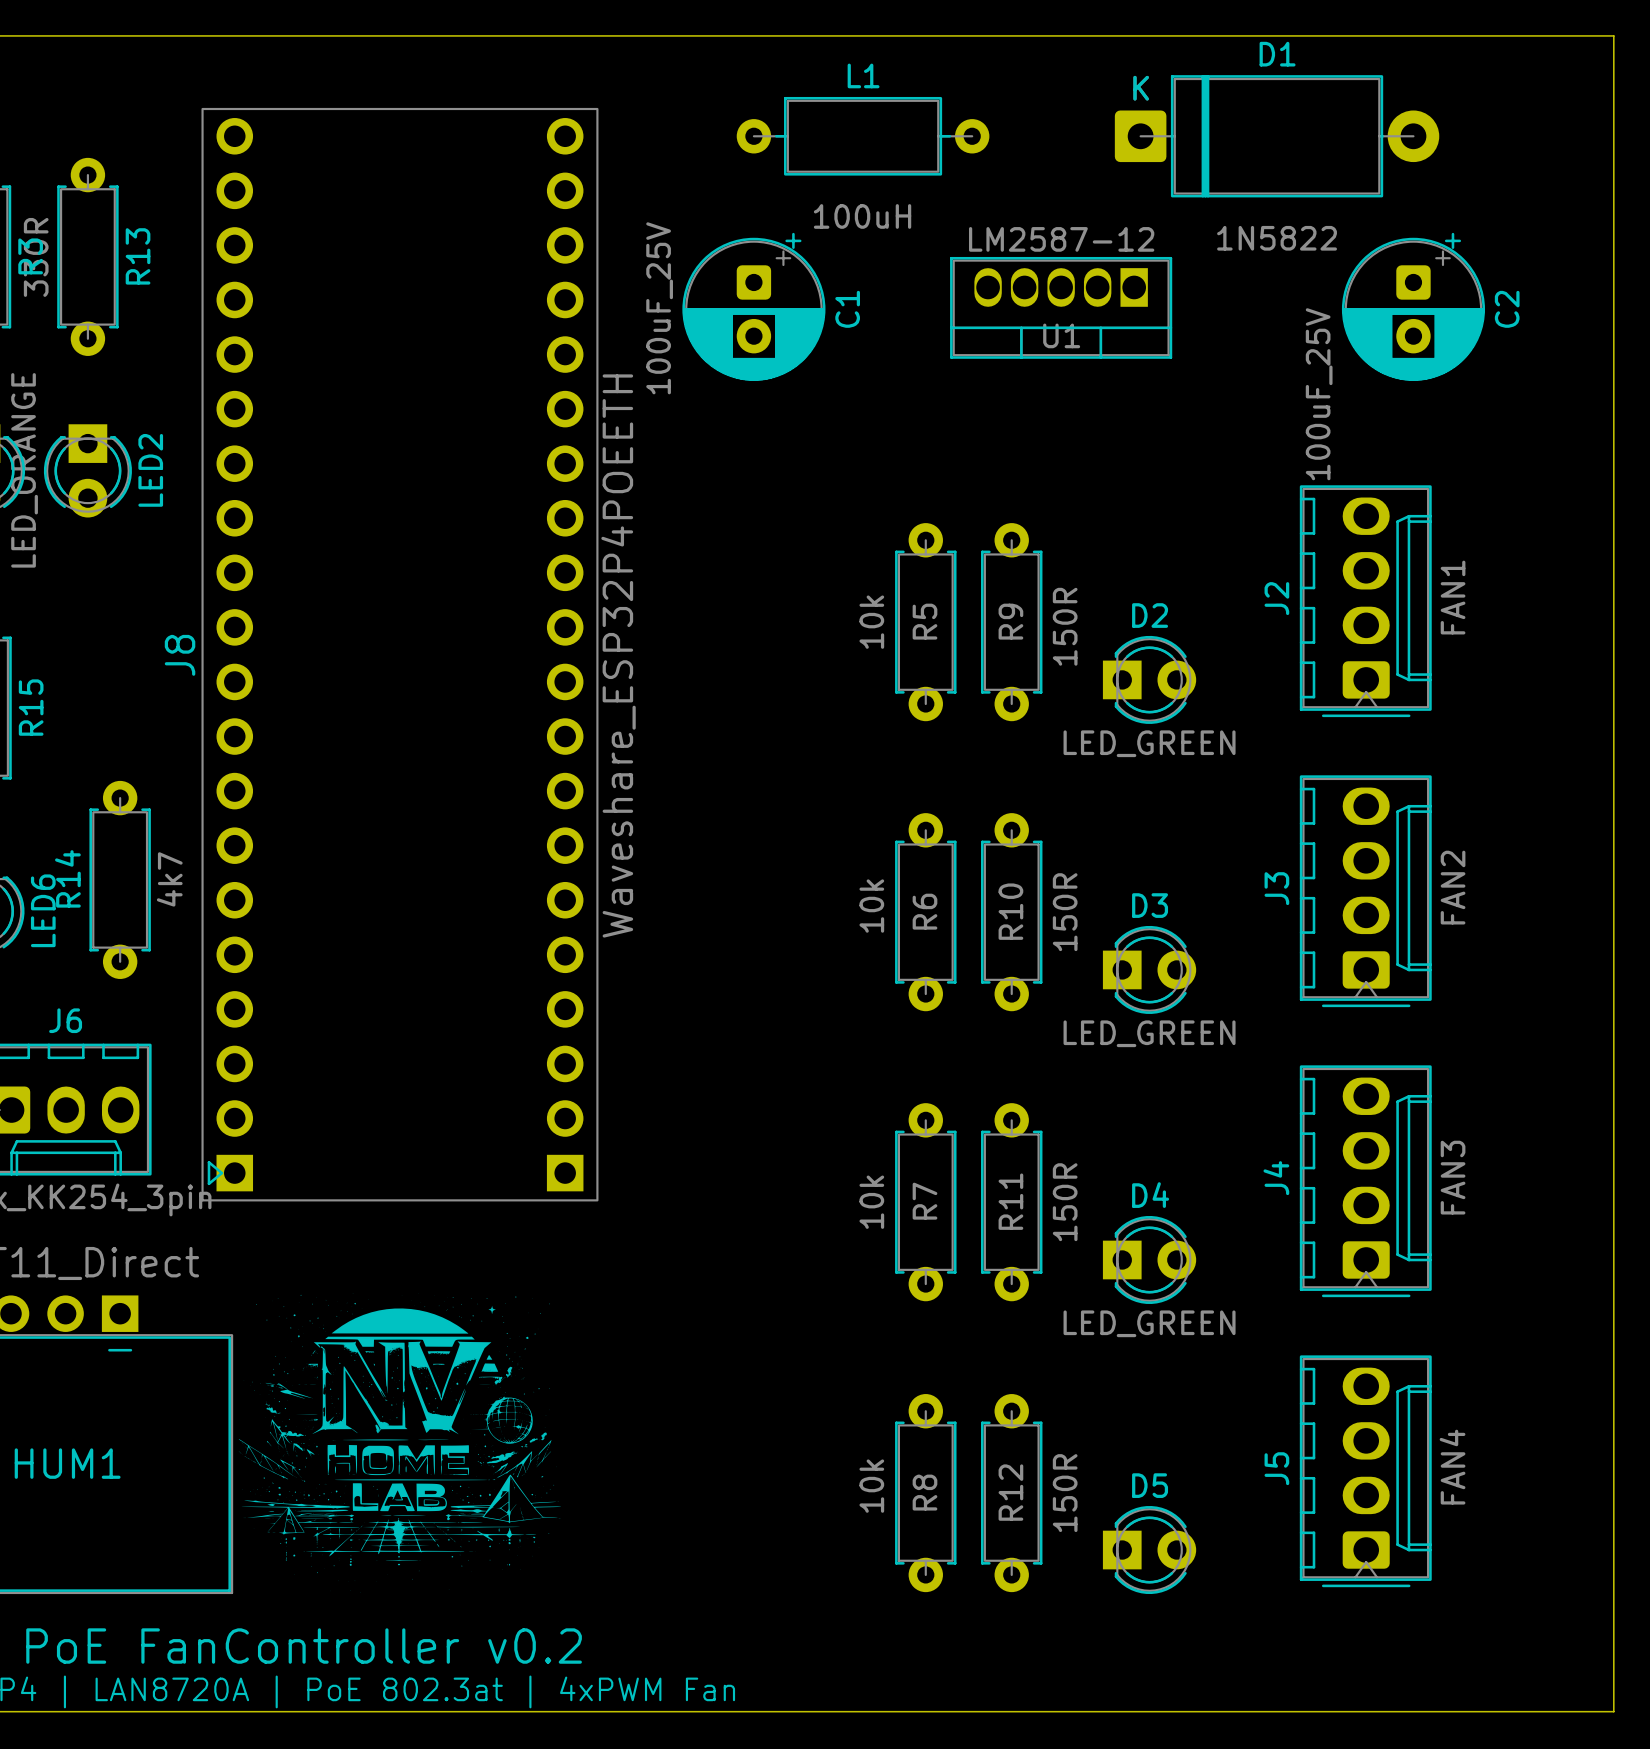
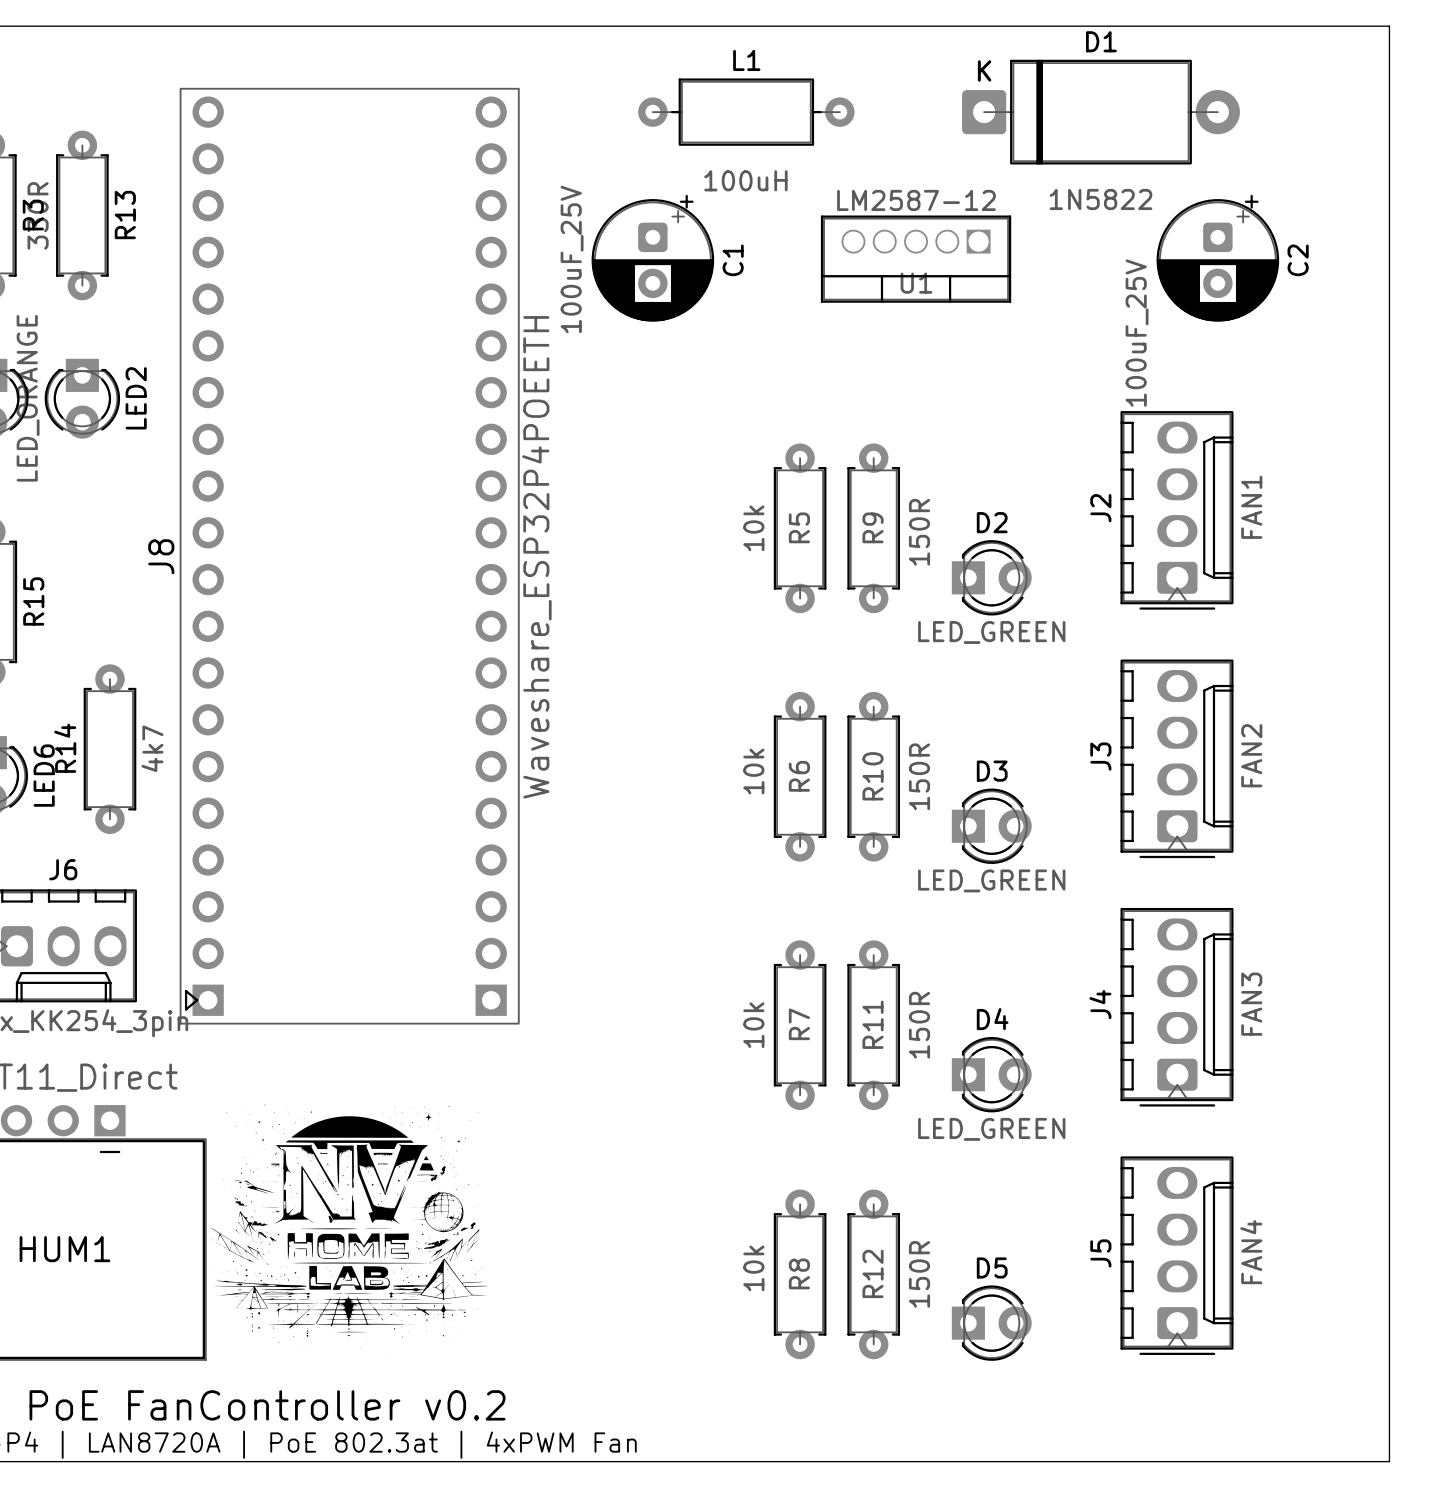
U1 footprint: [950, 256, 1173, 359] -> [820, 215, 1012, 303]

